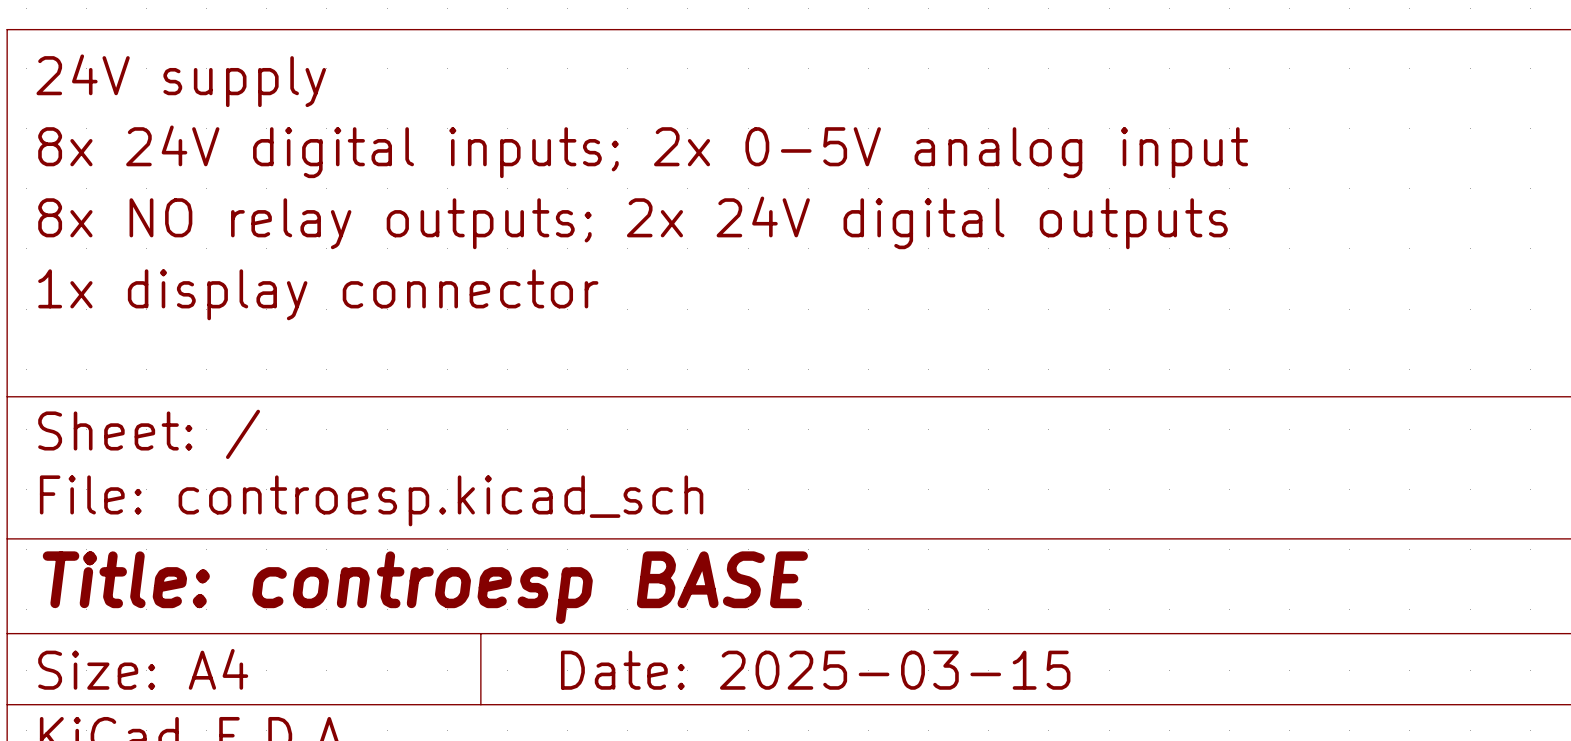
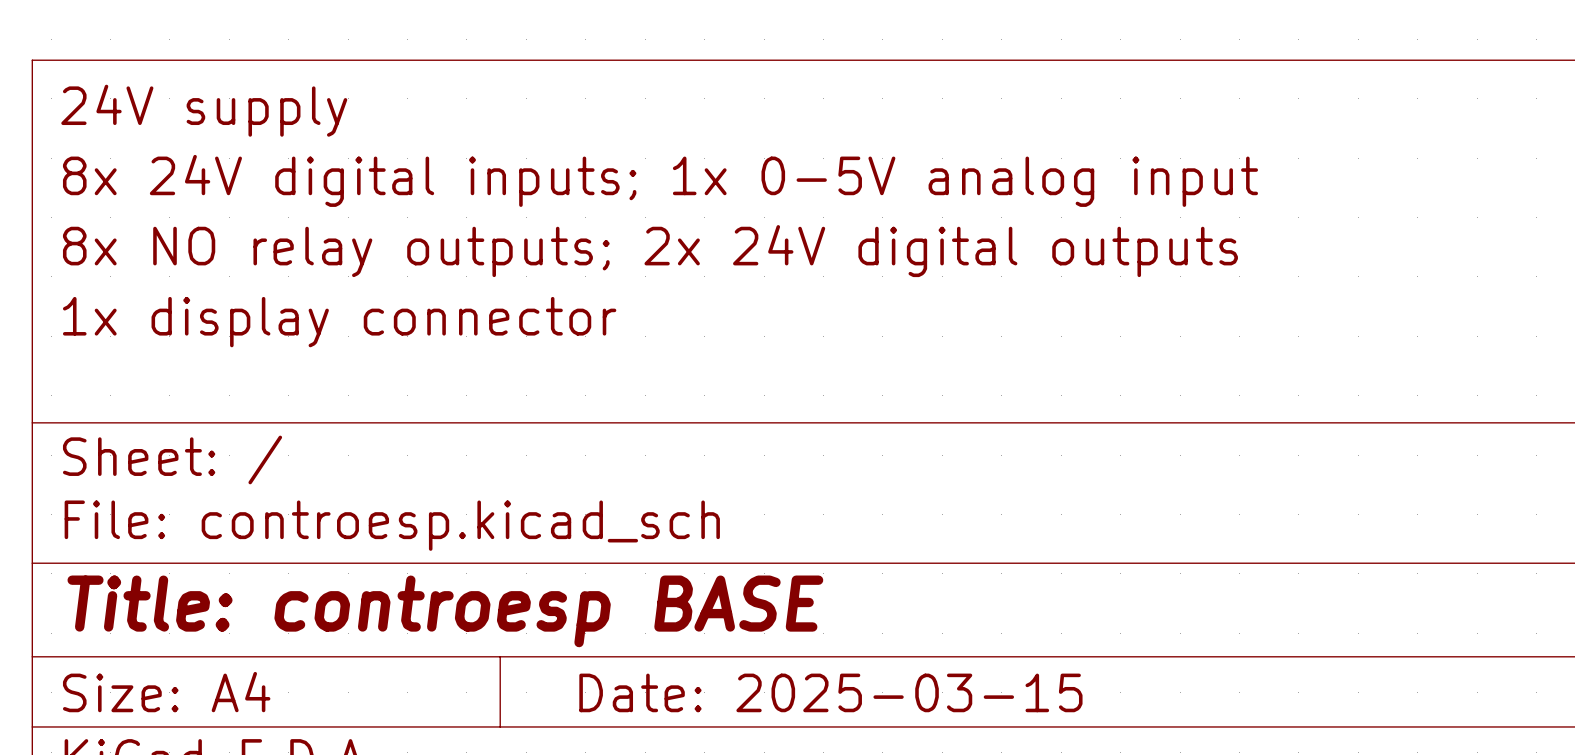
title block: 8x 24V digital inputs; 2x 0-5V analog input (643, 151) -> 8x 24V digital inputs; 1x 0-5V analog input (660, 180)

